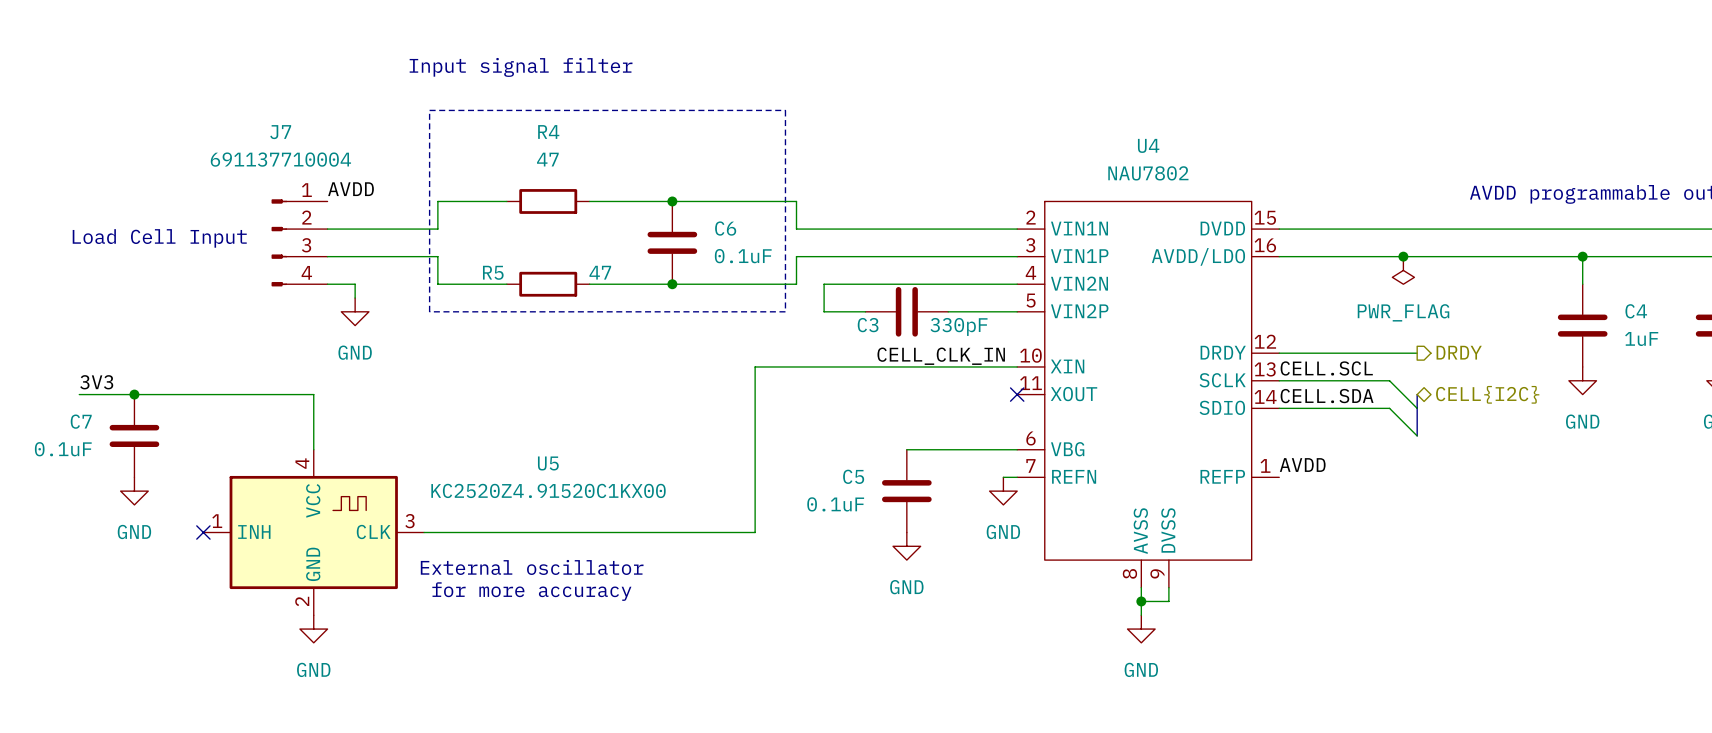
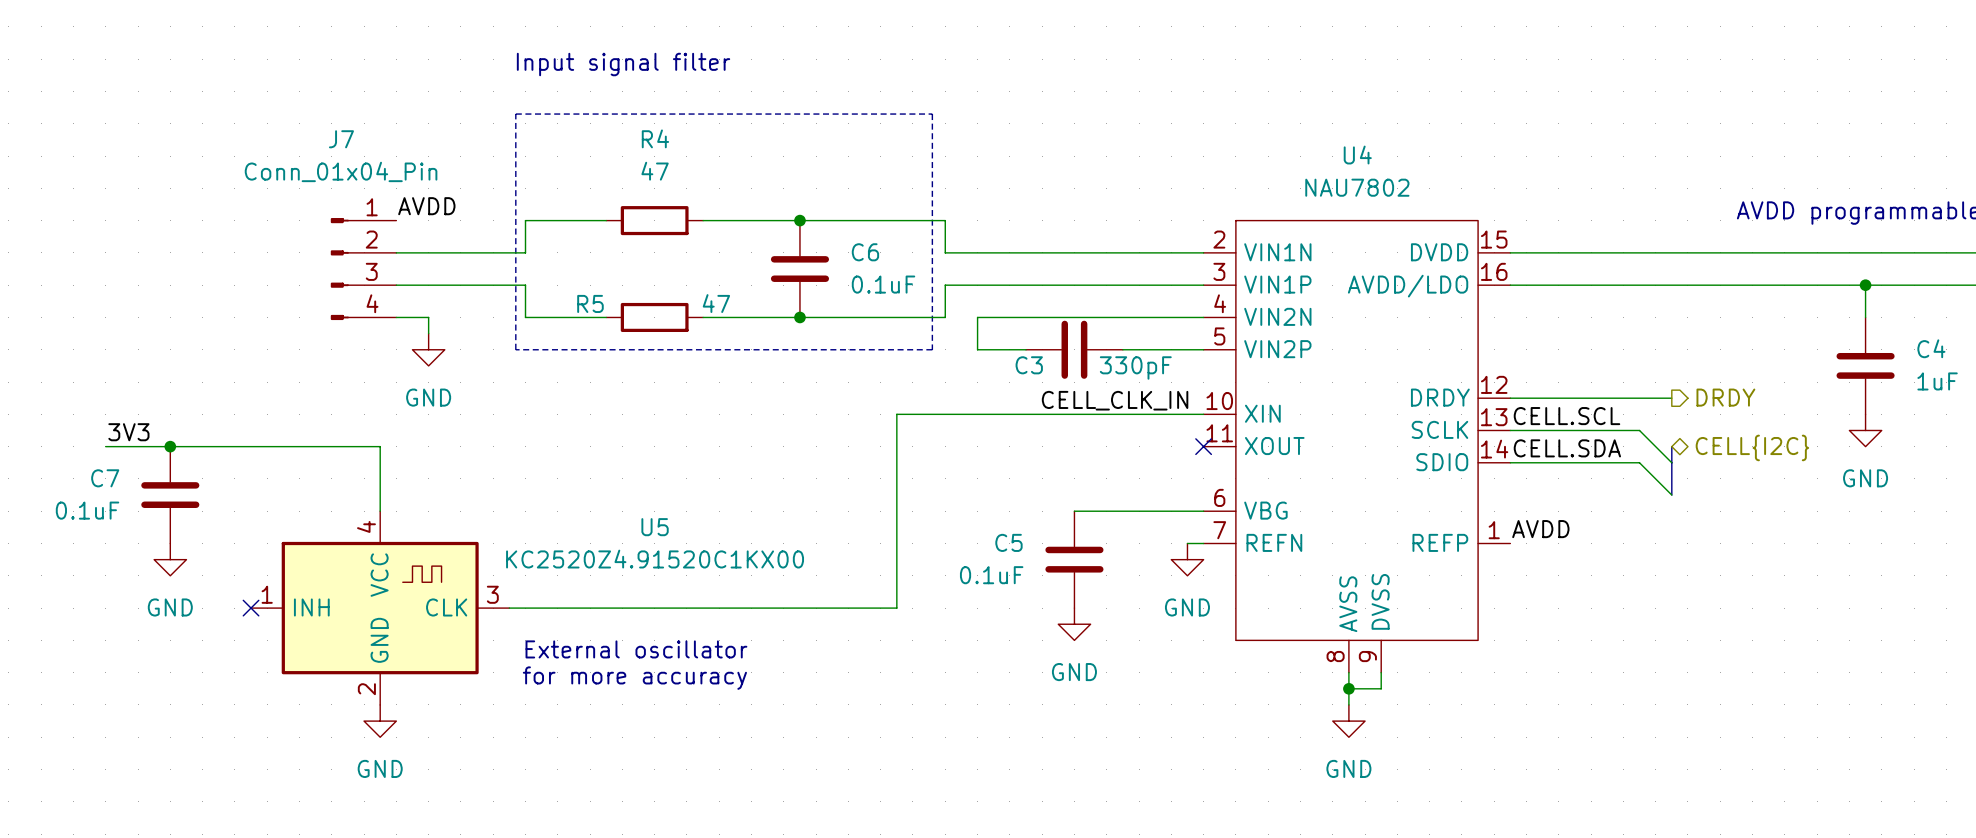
J7 value: 691137710004 (280, 159) -> Conn_01x04_Pin (341, 171)
text: Load Cell Input (159, 238) -> none
junction: (1403, 256) -> none
power symbol: PWR_FLAG (1403, 270) -> none

